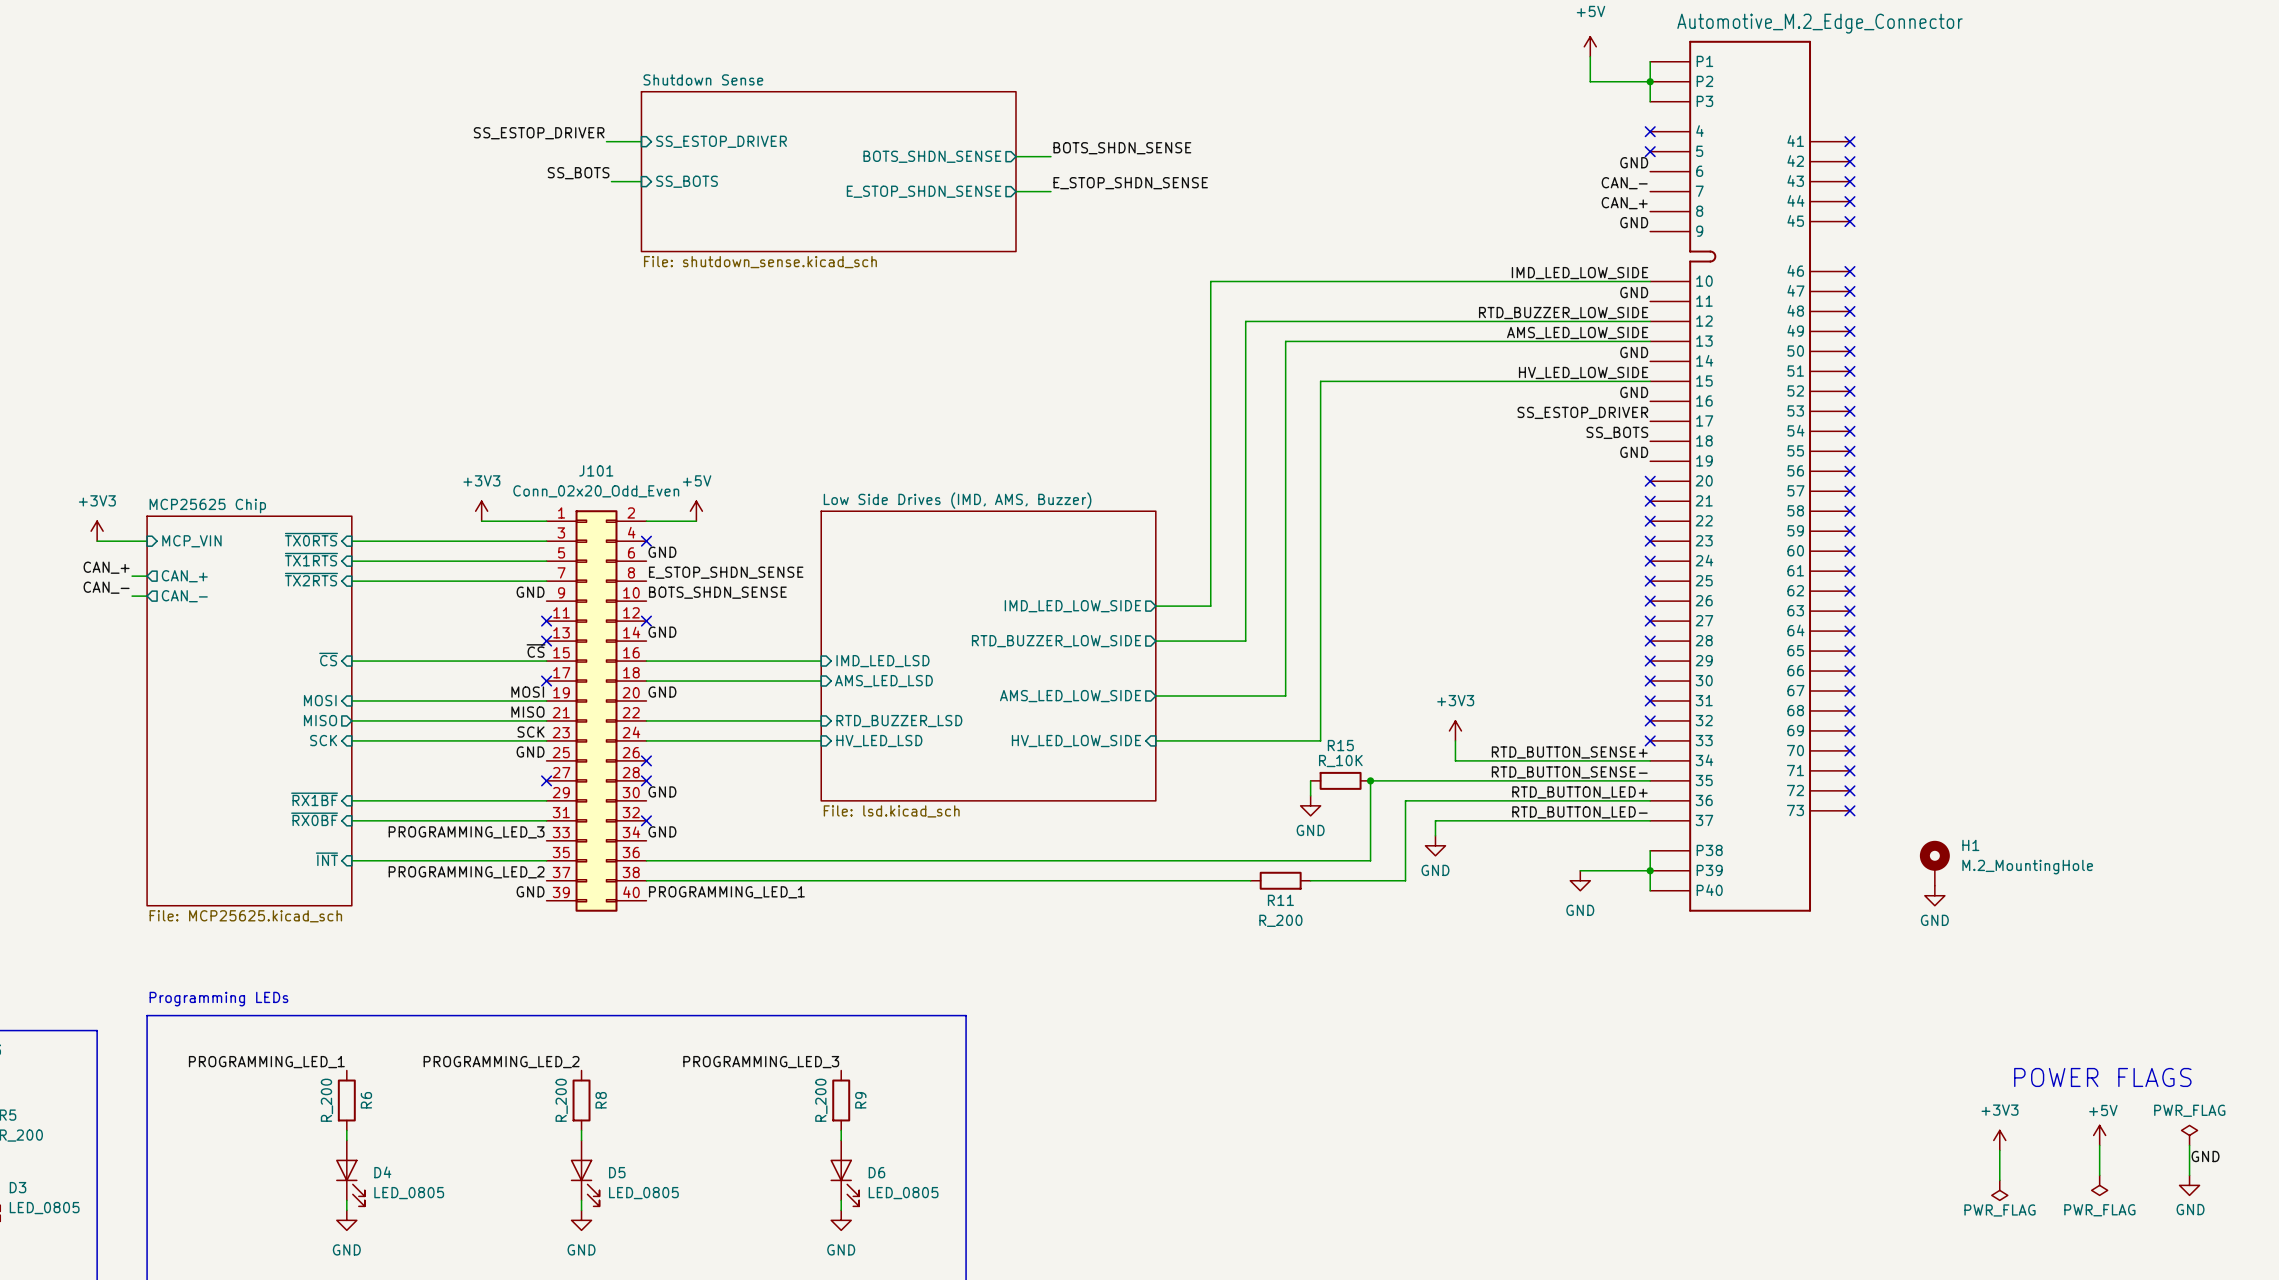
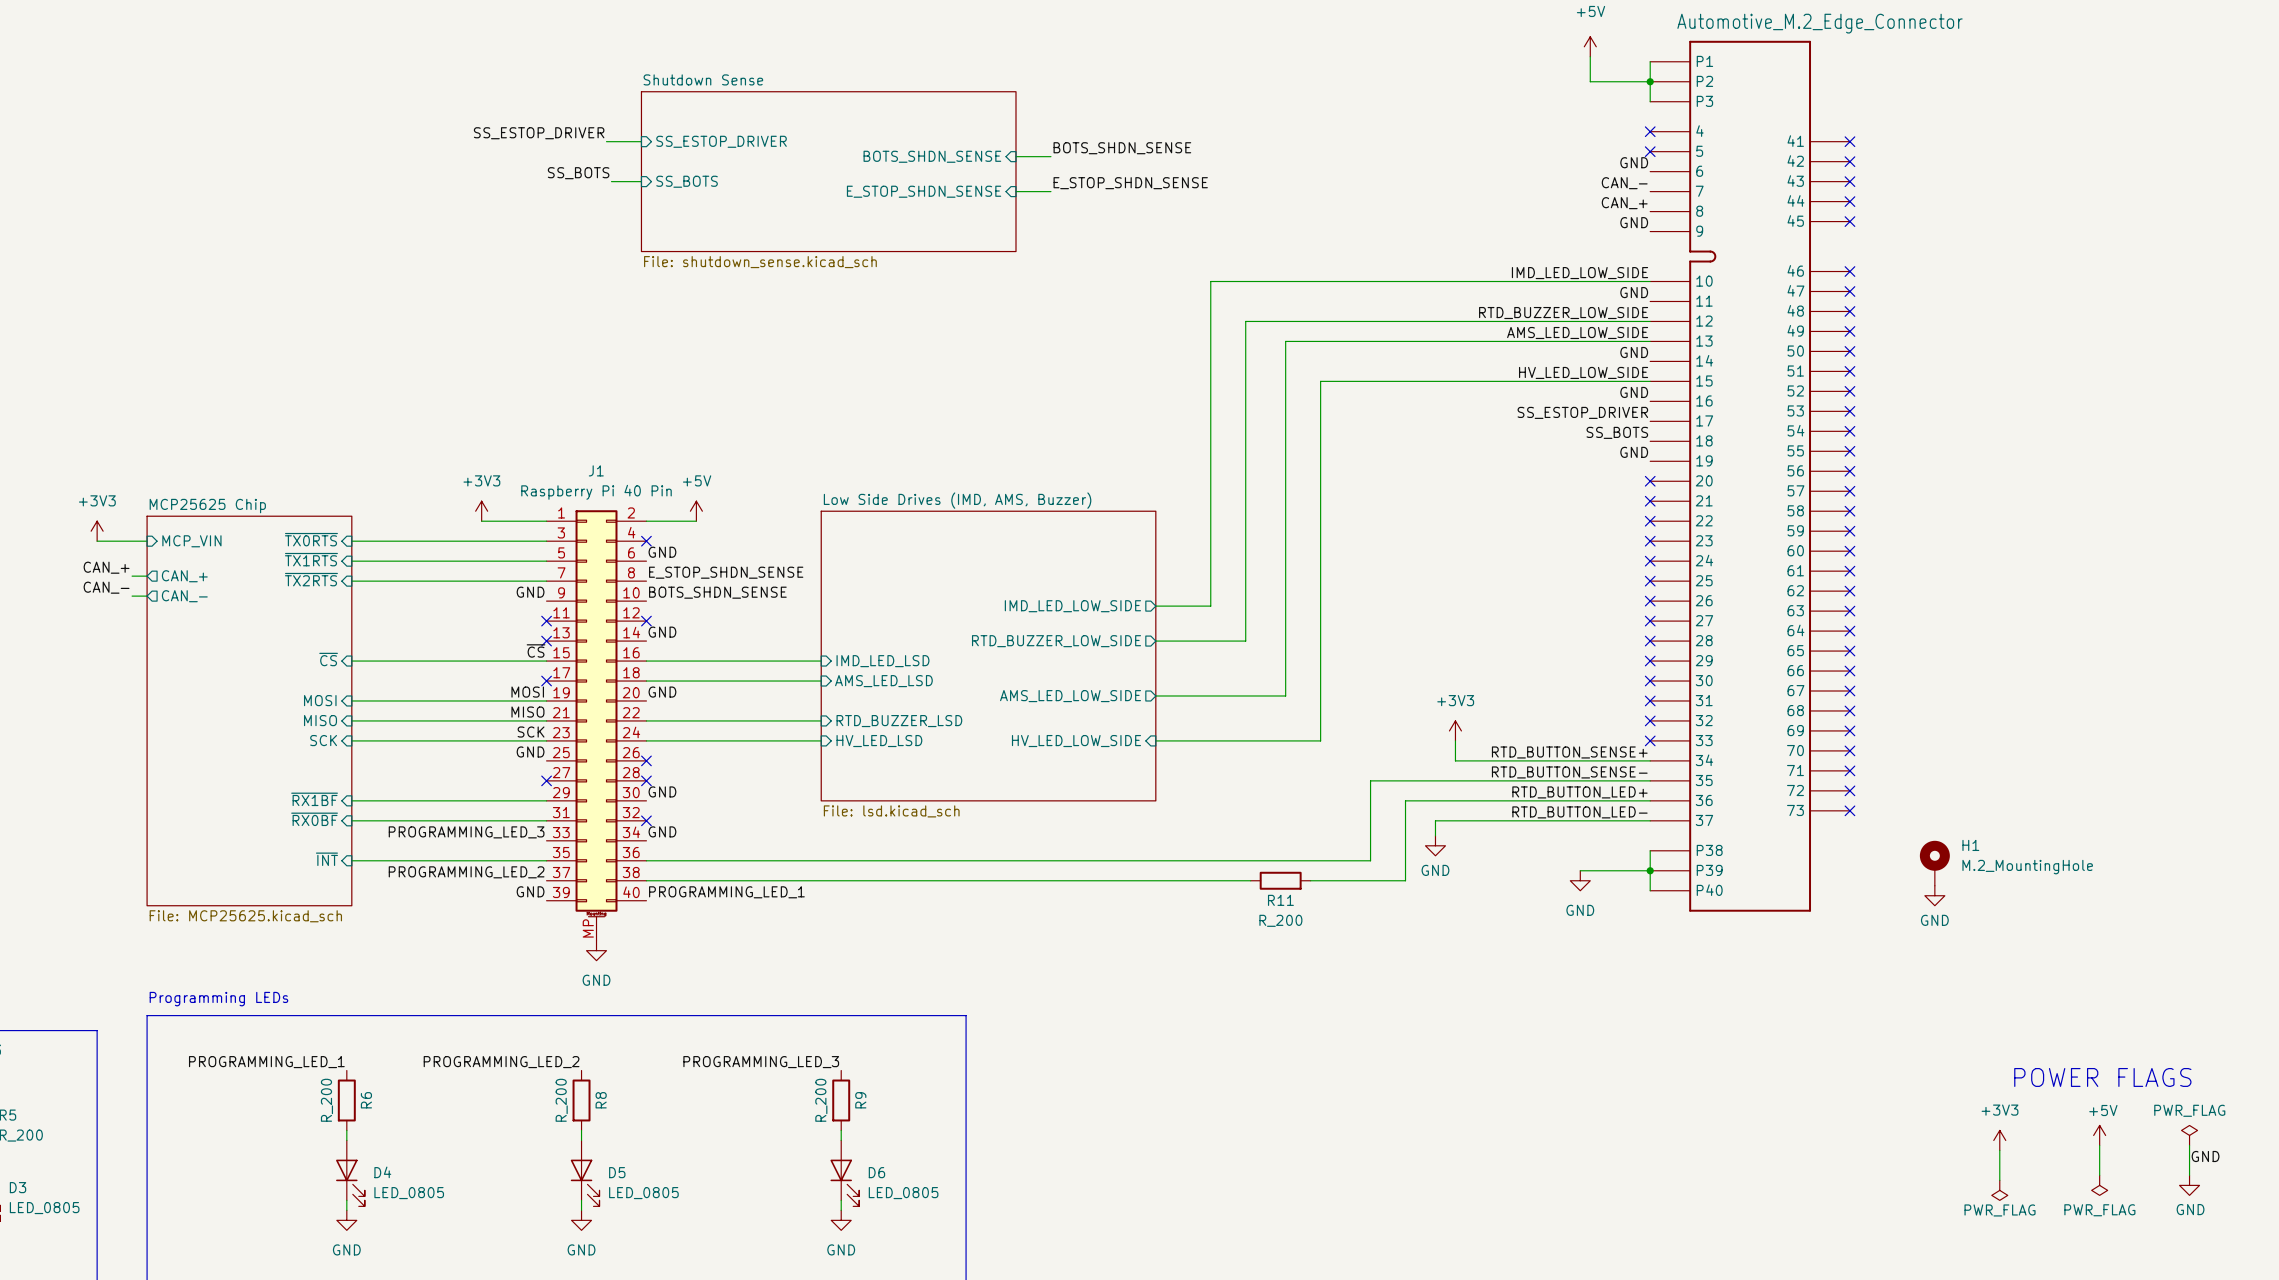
sheet pin shape: output (932, 156) -> input (932, 156)
sheet pin shape: output (924, 191) -> input (924, 191)
J101: Conn_02x20_Odd_Even (596, 710) -> none
sheet pin shape: output (320, 720) -> input (320, 720)
J1: none -> Raspberry Pi 40 Pin (596, 725)
wire: (1310, 780) (1310, 795) -> none
R15: R_10K (1340, 780) -> none
junction: (1370, 780) -> none
power symbol: GND (1310, 805) -> none
power symbol: none -> GND (596, 950)

